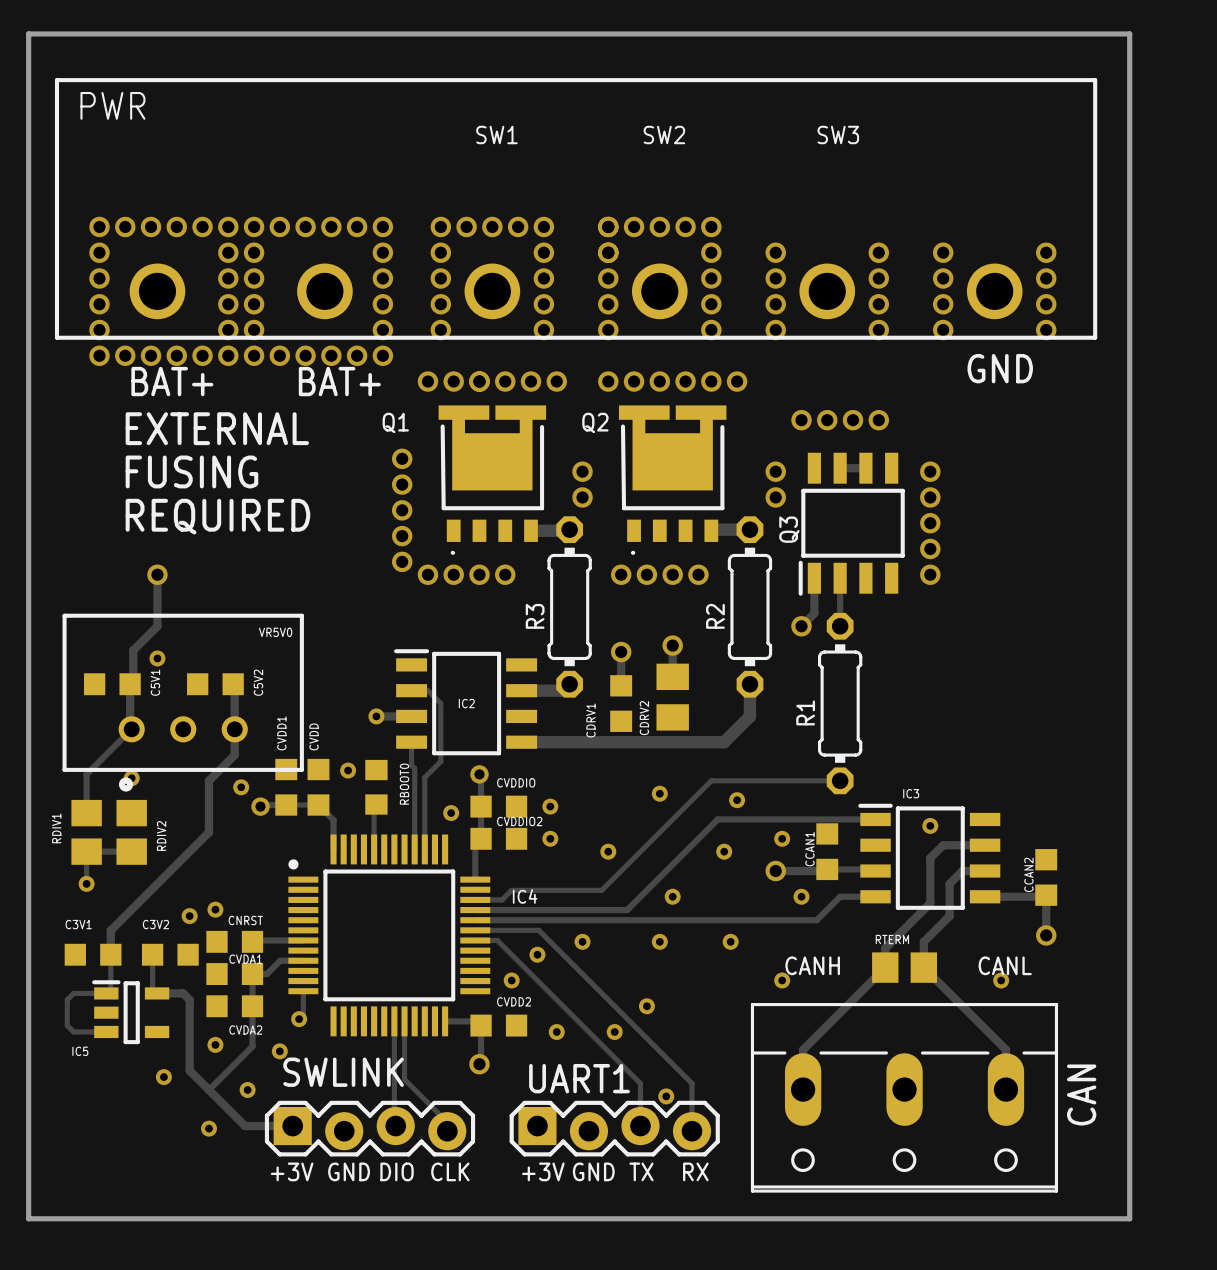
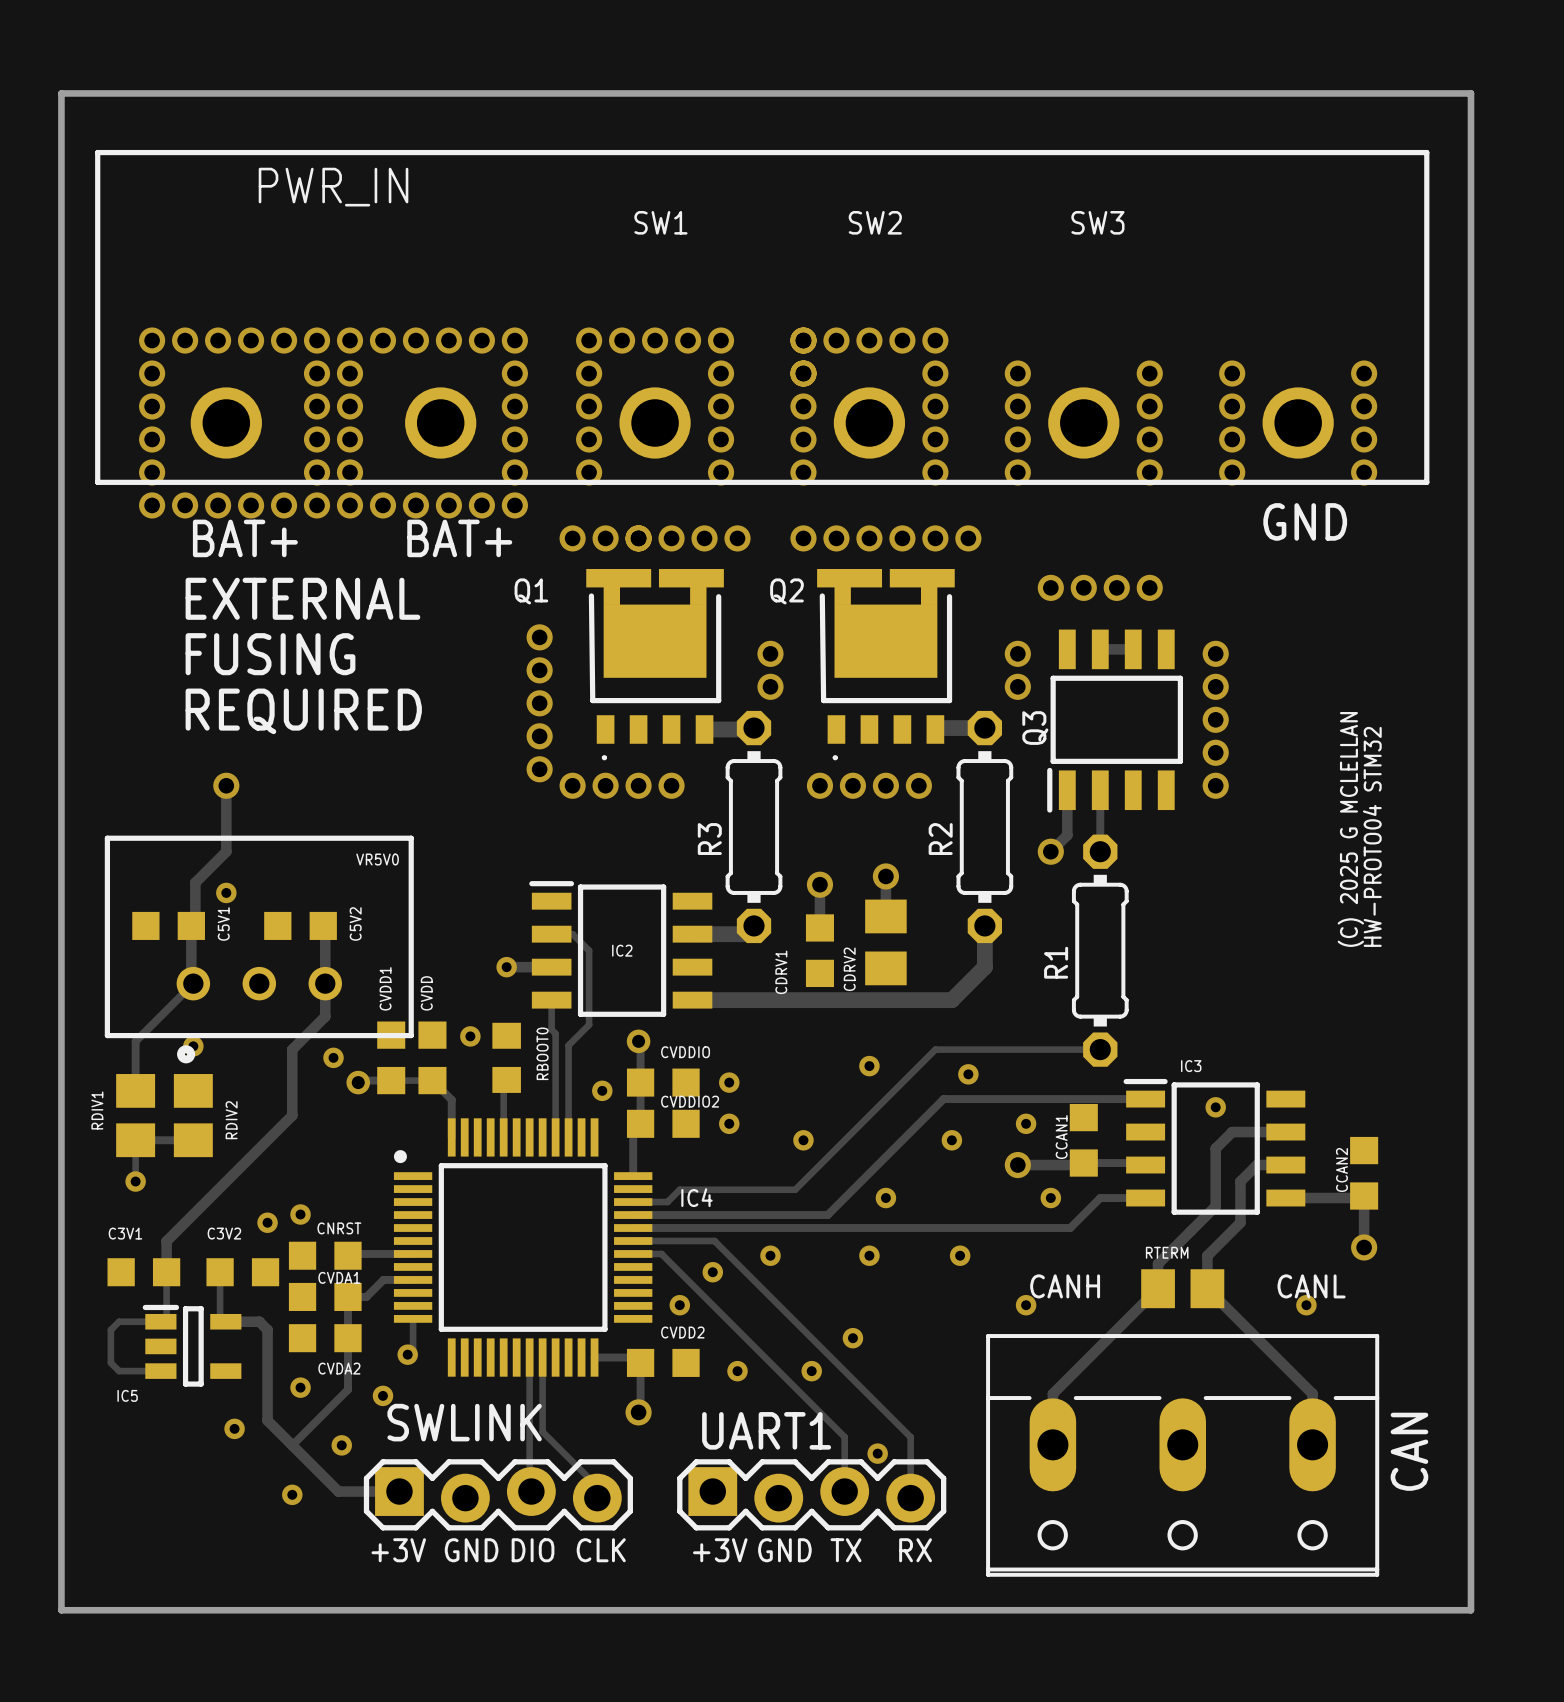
PWR name: PWR (112, 105) -> PWR_IN (333, 187)
text: none -> (C) 2025 G MCLELLAN (1350, 829)
text: none -> HW-PROTO04 STM32 (1372, 836)

